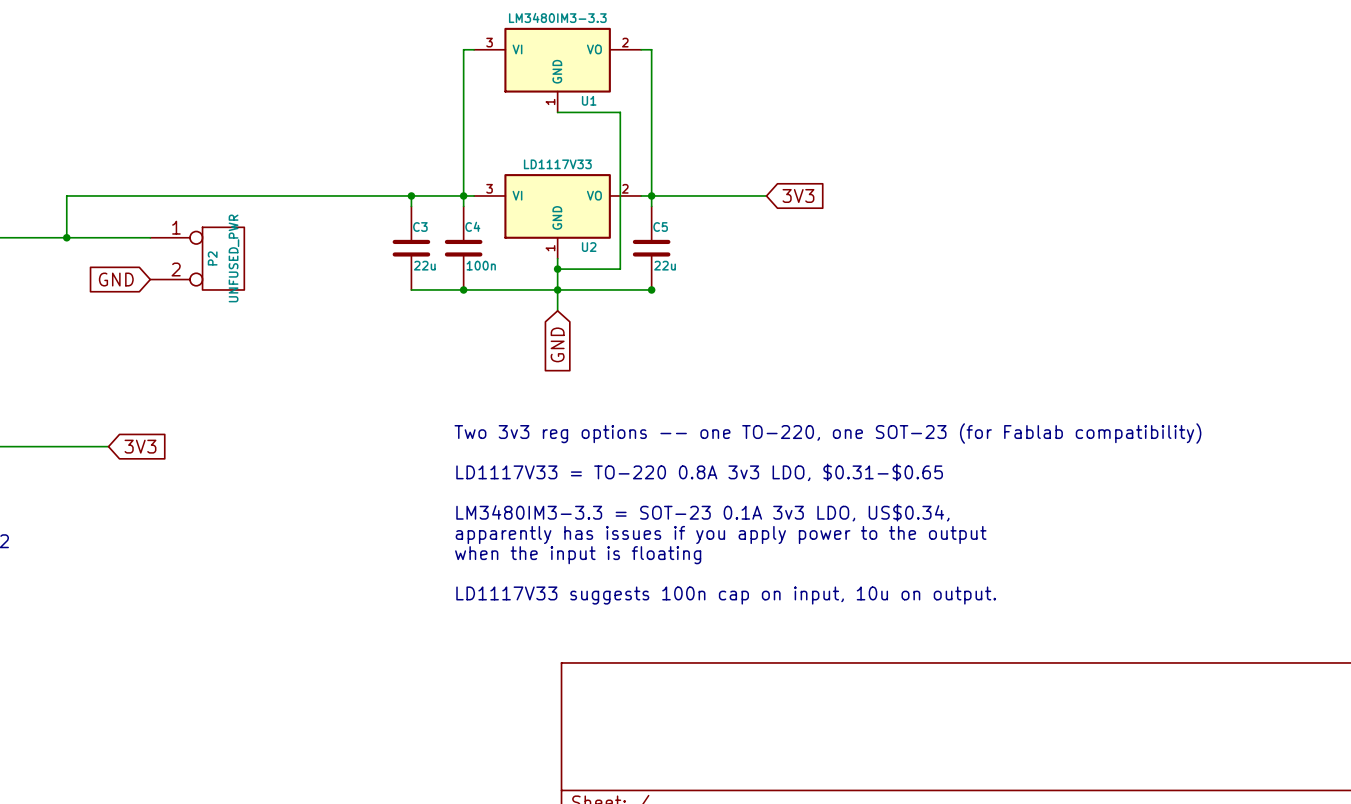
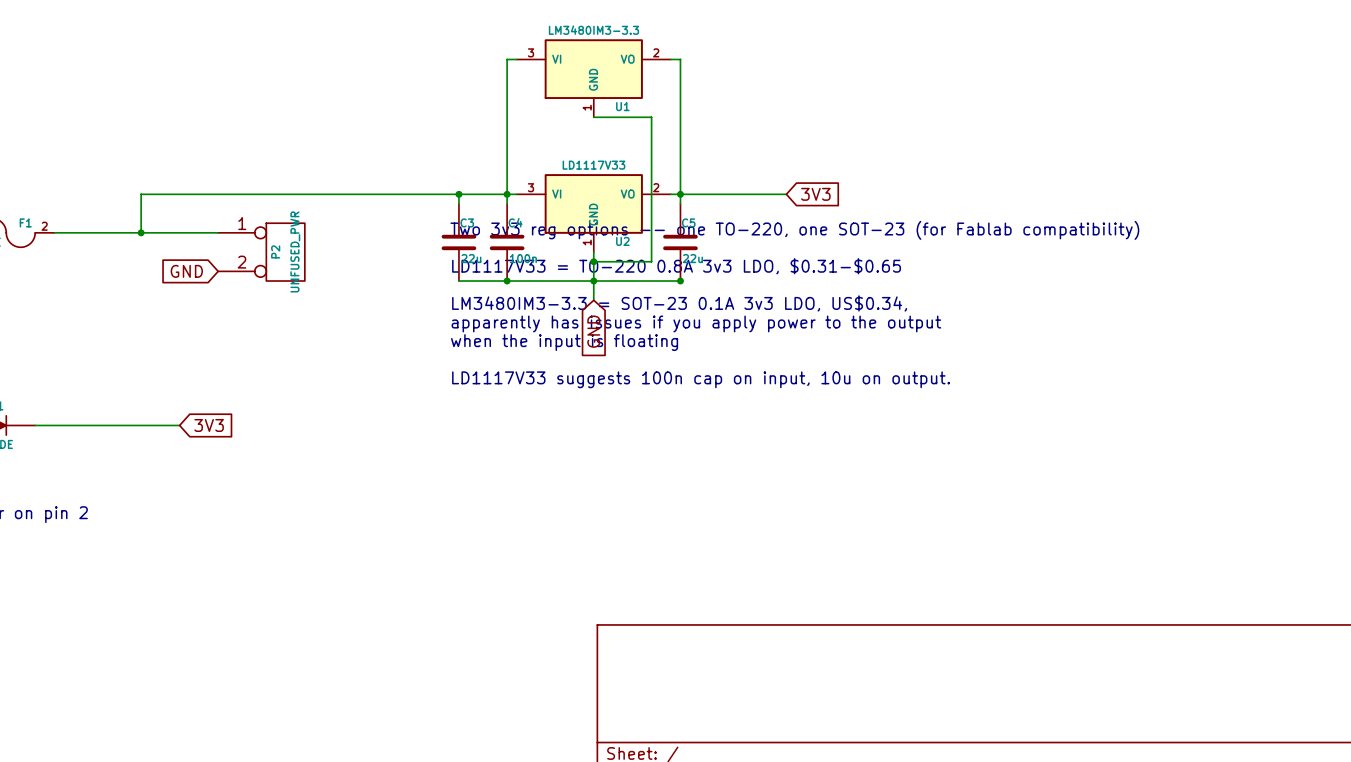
text position: Two 3v3 reg options -- one TO-220, one SOT-23 (for Fablab compatibility) (827, 433) -> Two 3v3 reg options -- one TO-220, one SOT-23 (for Fablab compatibility) (794, 230)
text position: LD1117V33 = TO-220 0.8A 3v3 LDO, $0.31-$0.65 (699, 472) -> LD1117V33 = TO-220 0.8A 3v3 LDO, $0.31-$0.65 (676, 266)
text position: LM3480IM3-3.3 = SOT-23 0.1A 3v3 LDO, US$0.34, (702, 512) -> LM3480IM3-3.3 = SOT-23 0.1A 3v3 LDO, US$0.34, (679, 303)
text position: apparently has issues if you apply power to the output (721, 535) -> apparently has issues if you apply power to the output (696, 323)
text position: when the input is floating (578, 555) -> when the input is floating (564, 342)
text position: LD1117V33 suggests 100n cap on input, 10u on output. (726, 595) -> LD1117V33 suggests 100n cap on input, 10u on output. (701, 379)

